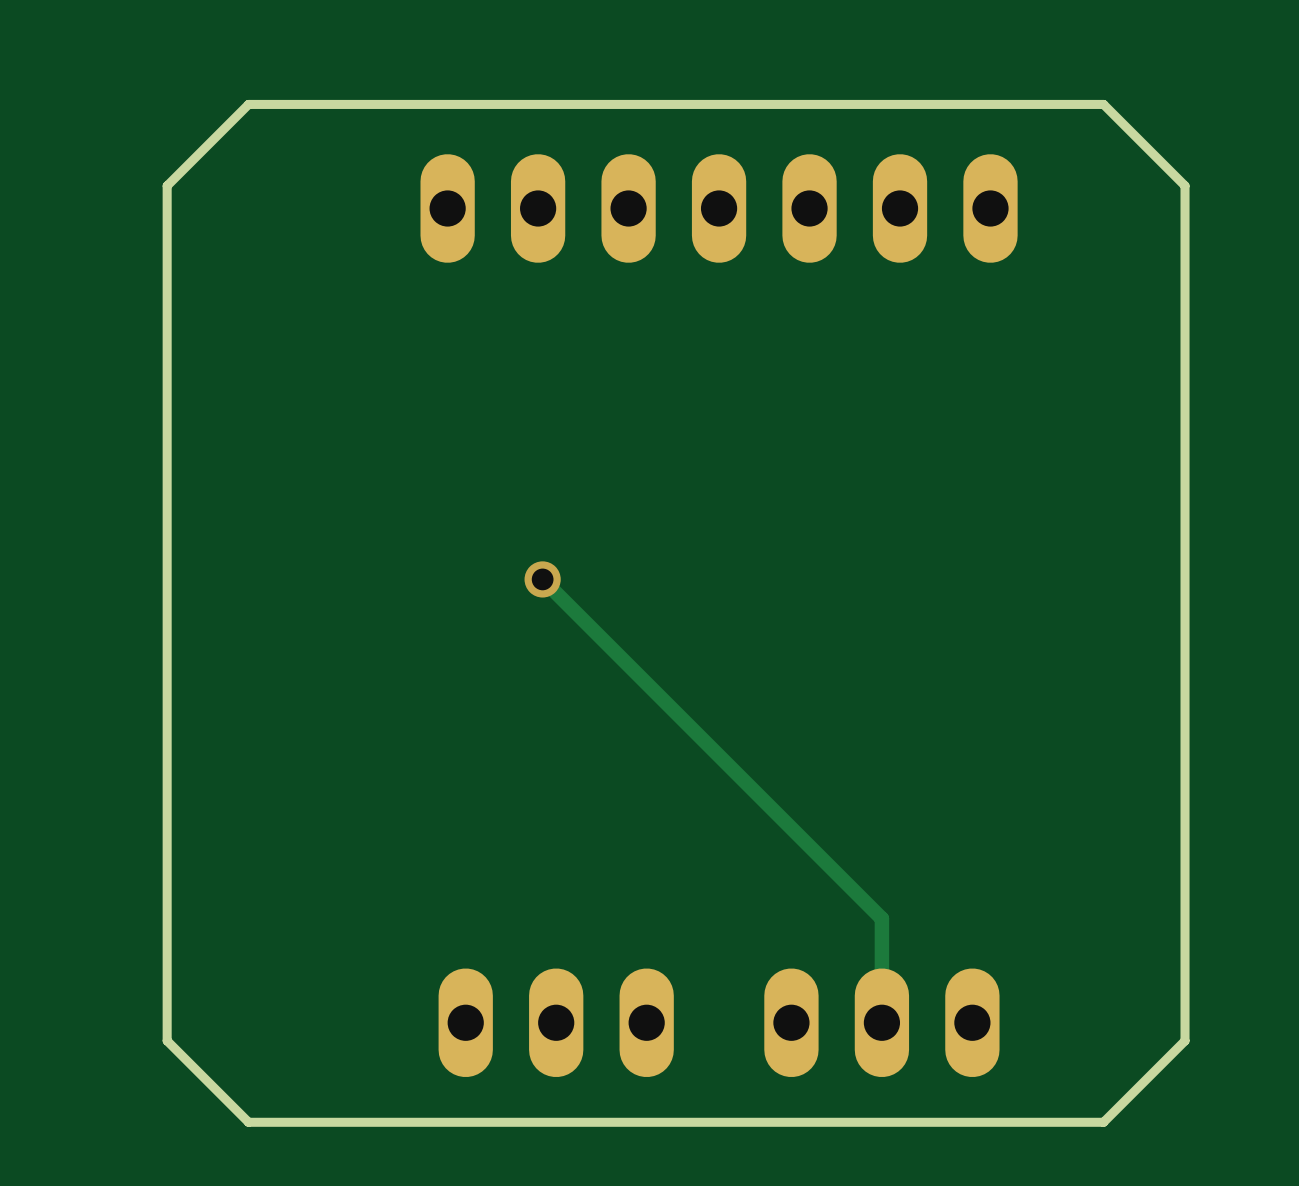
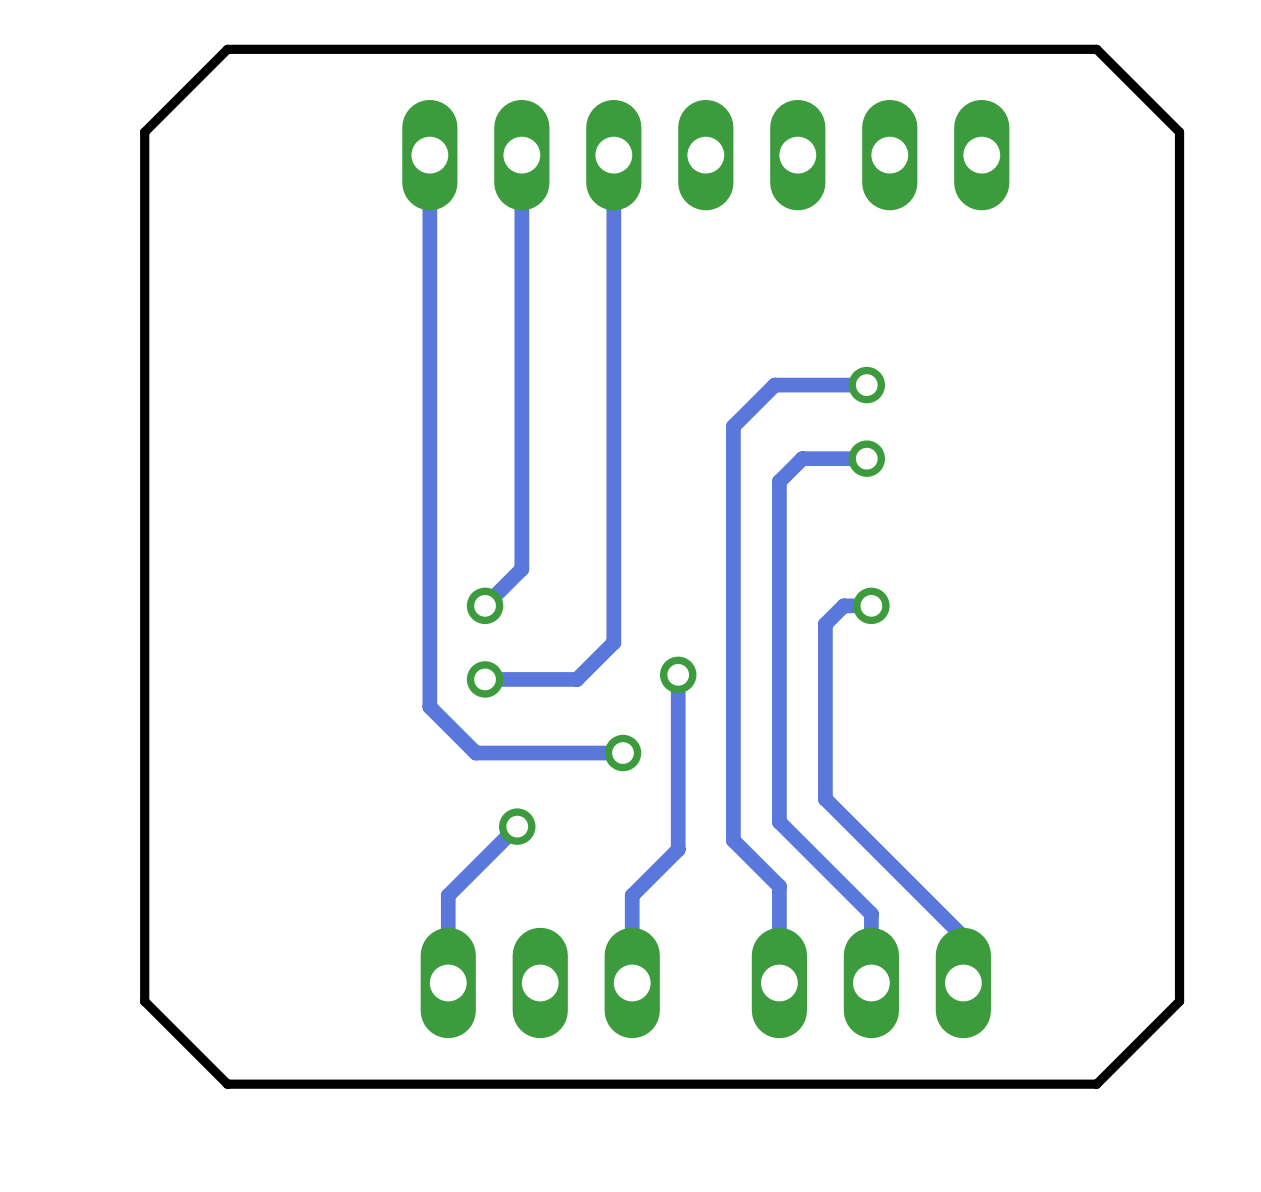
track: none -> (429, 155) (429, 707) (475, 753) (623, 753)
track: none -> (521, 155) (521, 569) (485, 605)
track: none -> (613, 155) (613, 642) (577, 679) (485, 679)
track: none -> (866, 385) (774, 385) (733, 426) (733, 840) (779, 886) (779, 982)
via: none -> (866, 385)
via: none -> (866, 458)
track: (542, 579) (881, 918) (881, 954) -> (866, 458) (802, 458) (779, 481) (779, 822) (871, 914)
via: (542, 579) -> none
via: none -> (485, 605)
track: none -> (871, 605) (843, 605) (825, 624) (825, 799) (963, 936) (963, 982)
via: none -> (871, 605)
track: none -> (678, 674) (678, 849) (632, 895) (632, 982)
via: none -> (678, 674)
via: none -> (485, 679)
via: none -> (623, 753)
track: none -> (517, 826) (448, 895) (448, 982)
via: none -> (517, 826)

